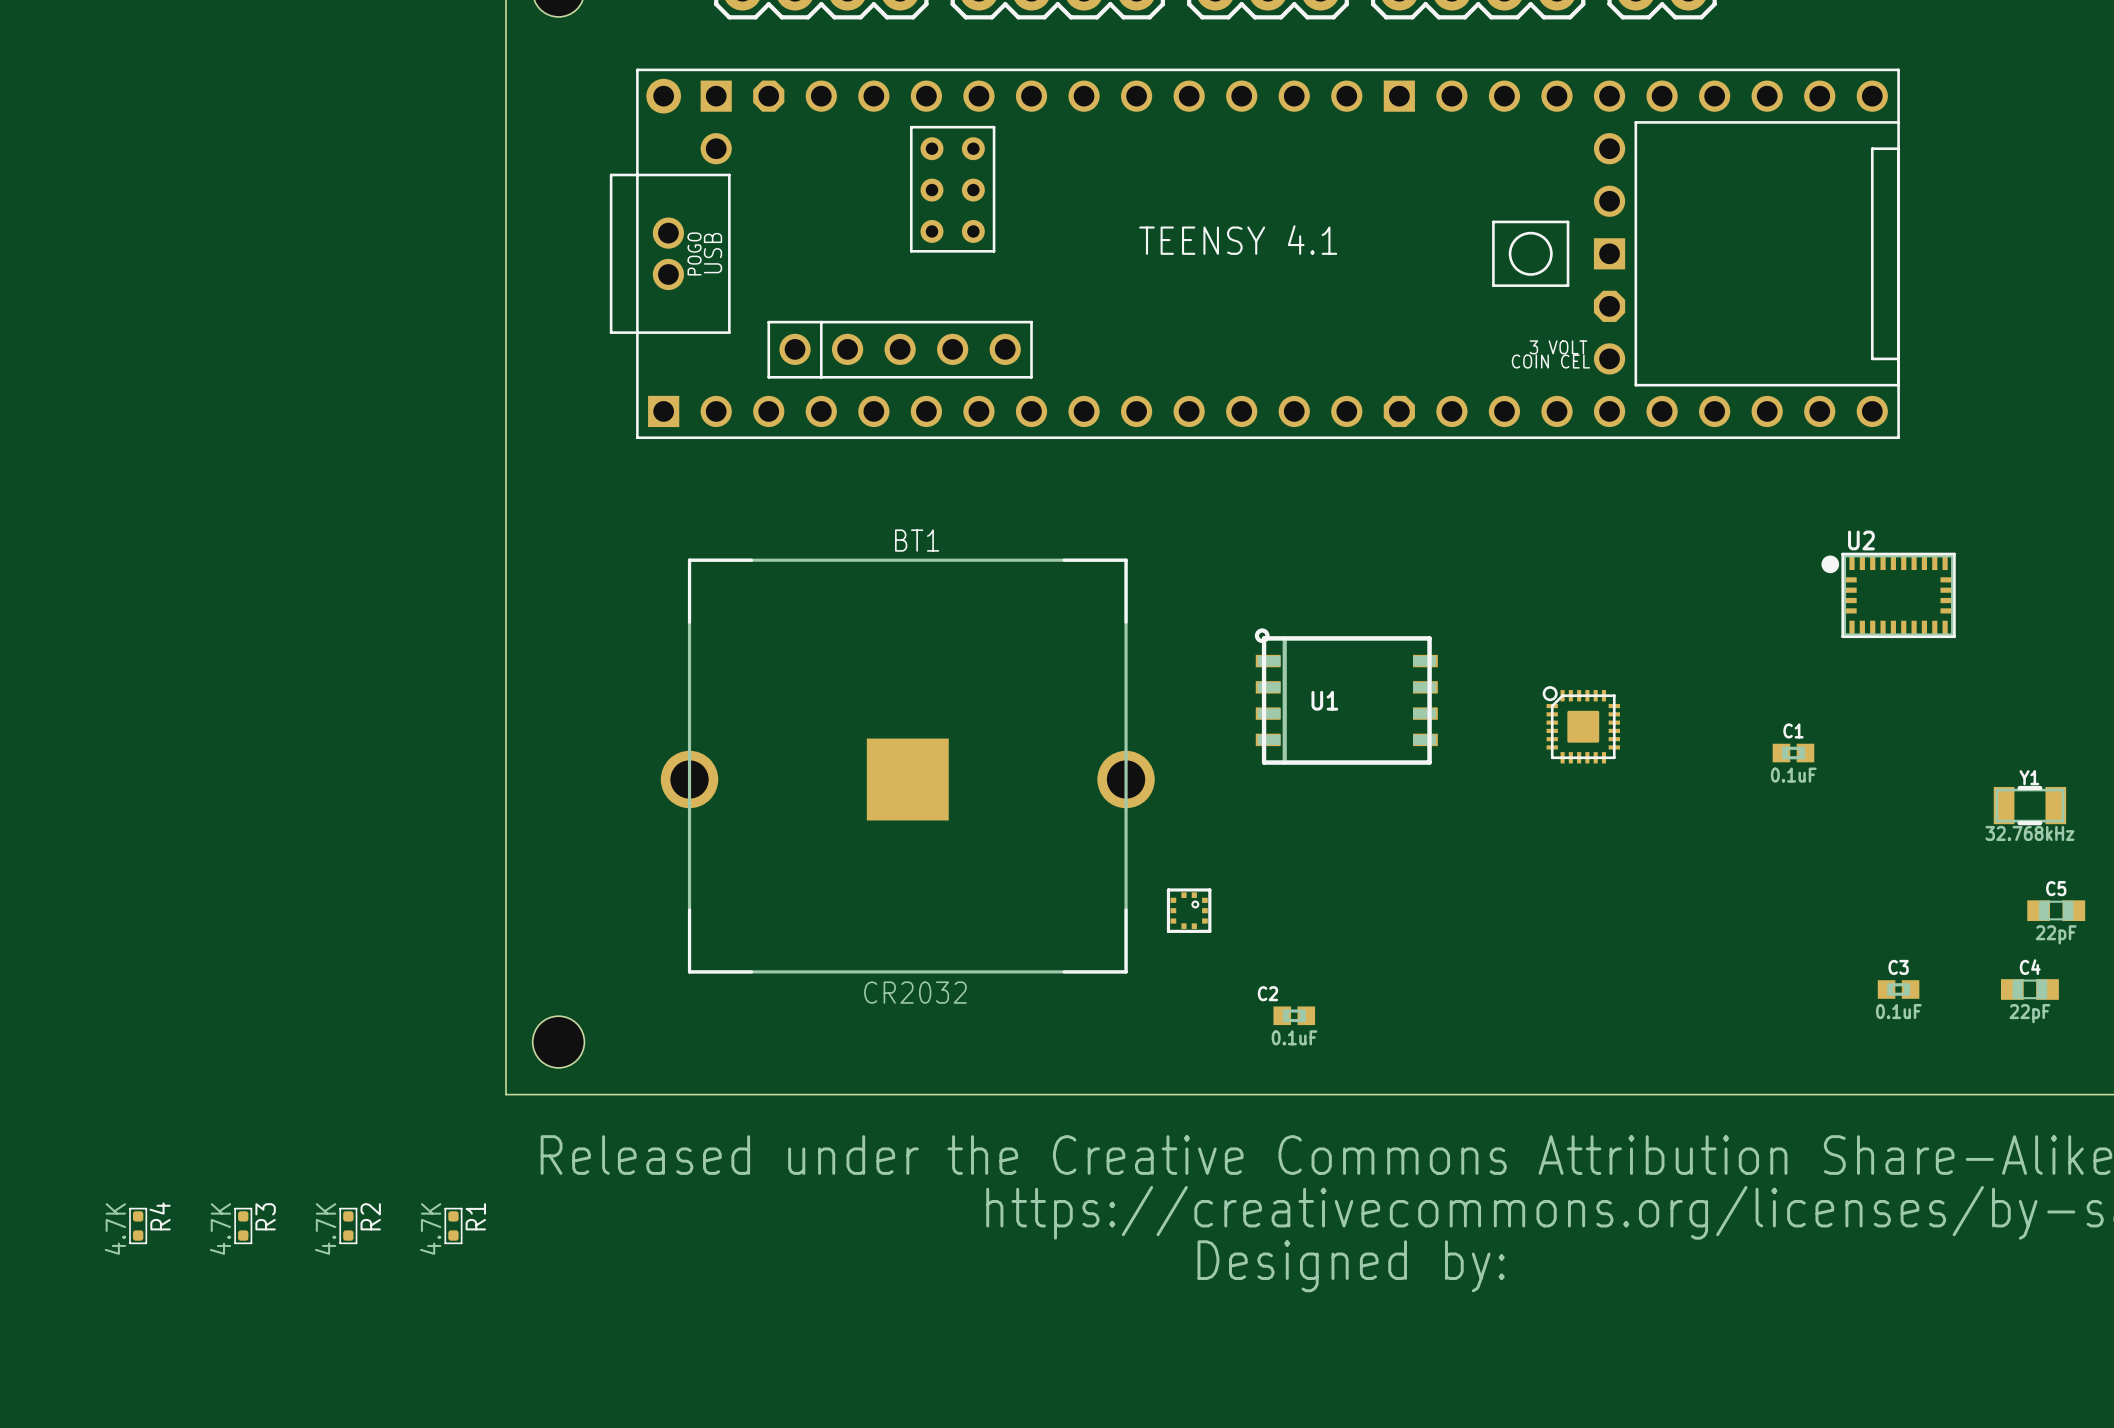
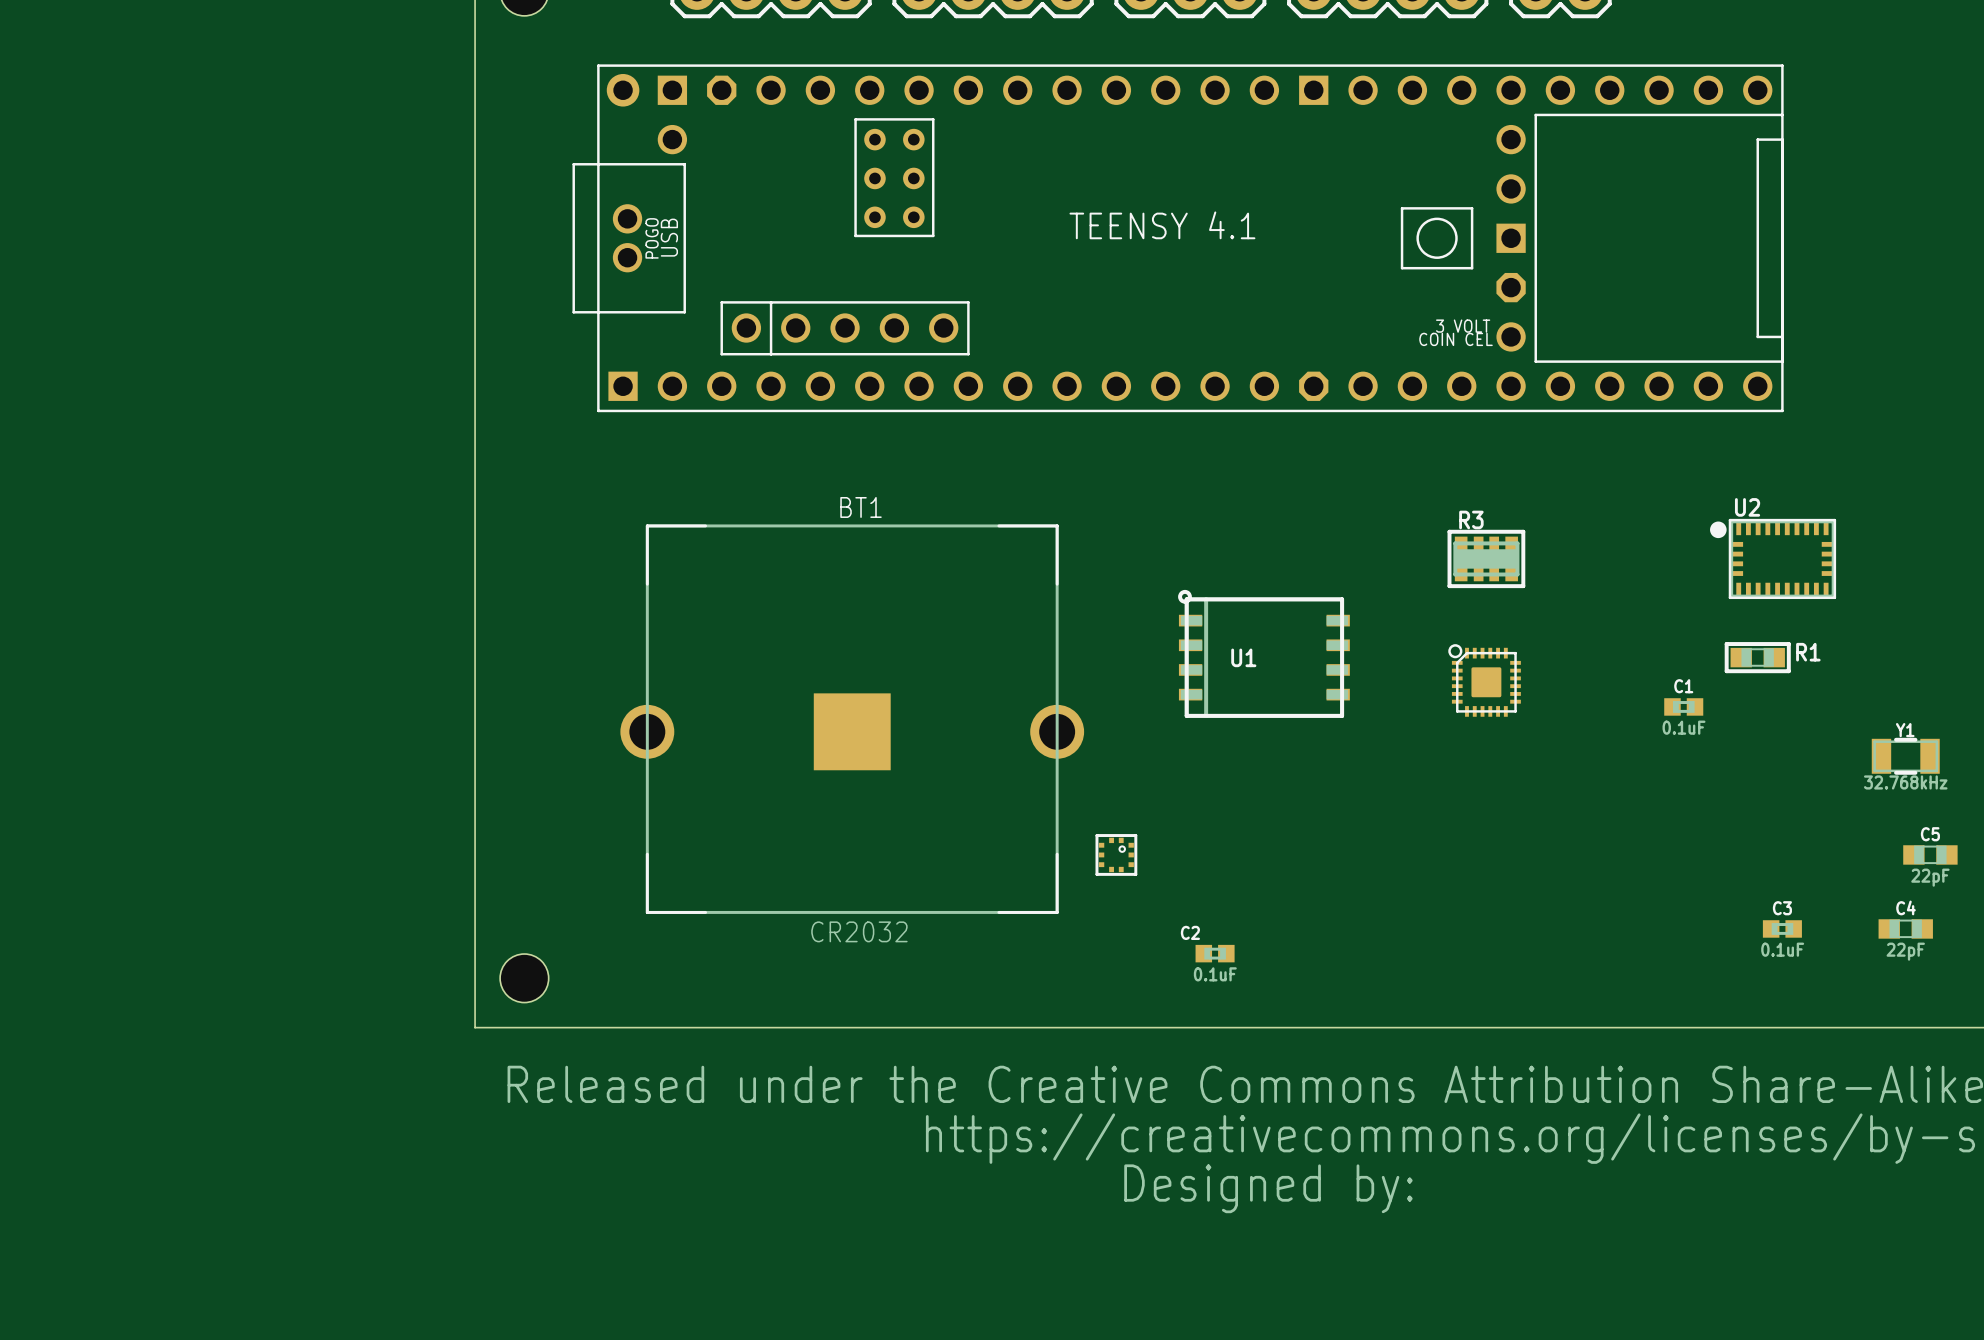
R3 footprint: [234, 1207, 253, 1245] -> [1447, 529, 1526, 589]
R1 footprint: [444, 1207, 463, 1245] -> [1724, 642, 1791, 674]
R3 name position: R3 (265, 1216) -> R3 (1471, 519)
R4: 4.7K (138, 1225) -> none
R2: 4.7K (348, 1225) -> none
R3 value: 4.7K (220, 1229) -> none
R1 value: 4.7K (430, 1229) -> none

